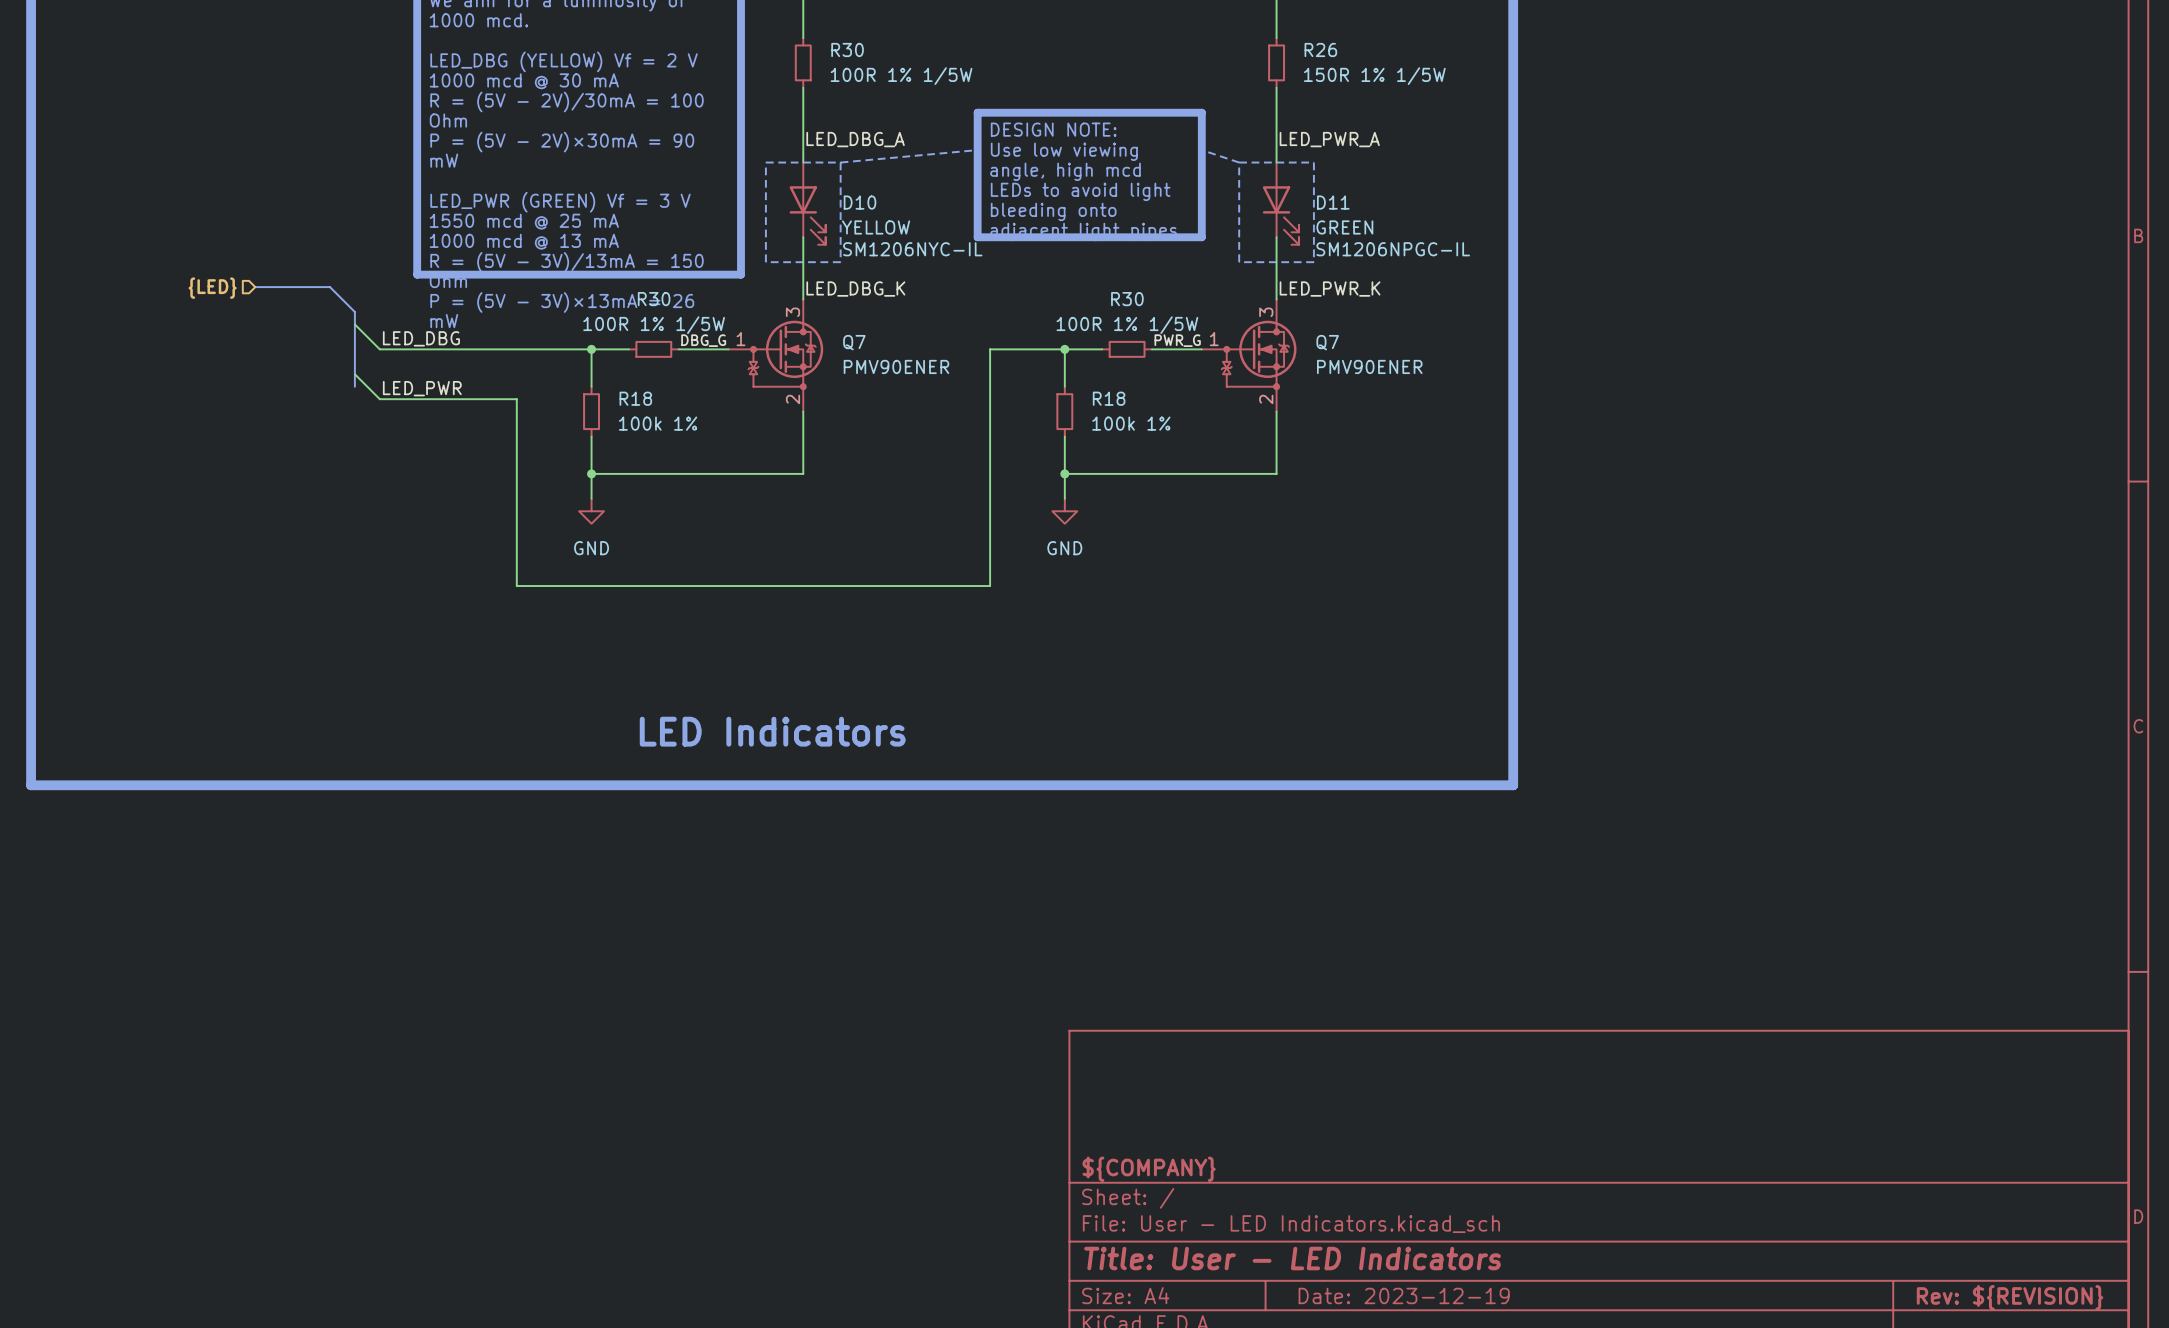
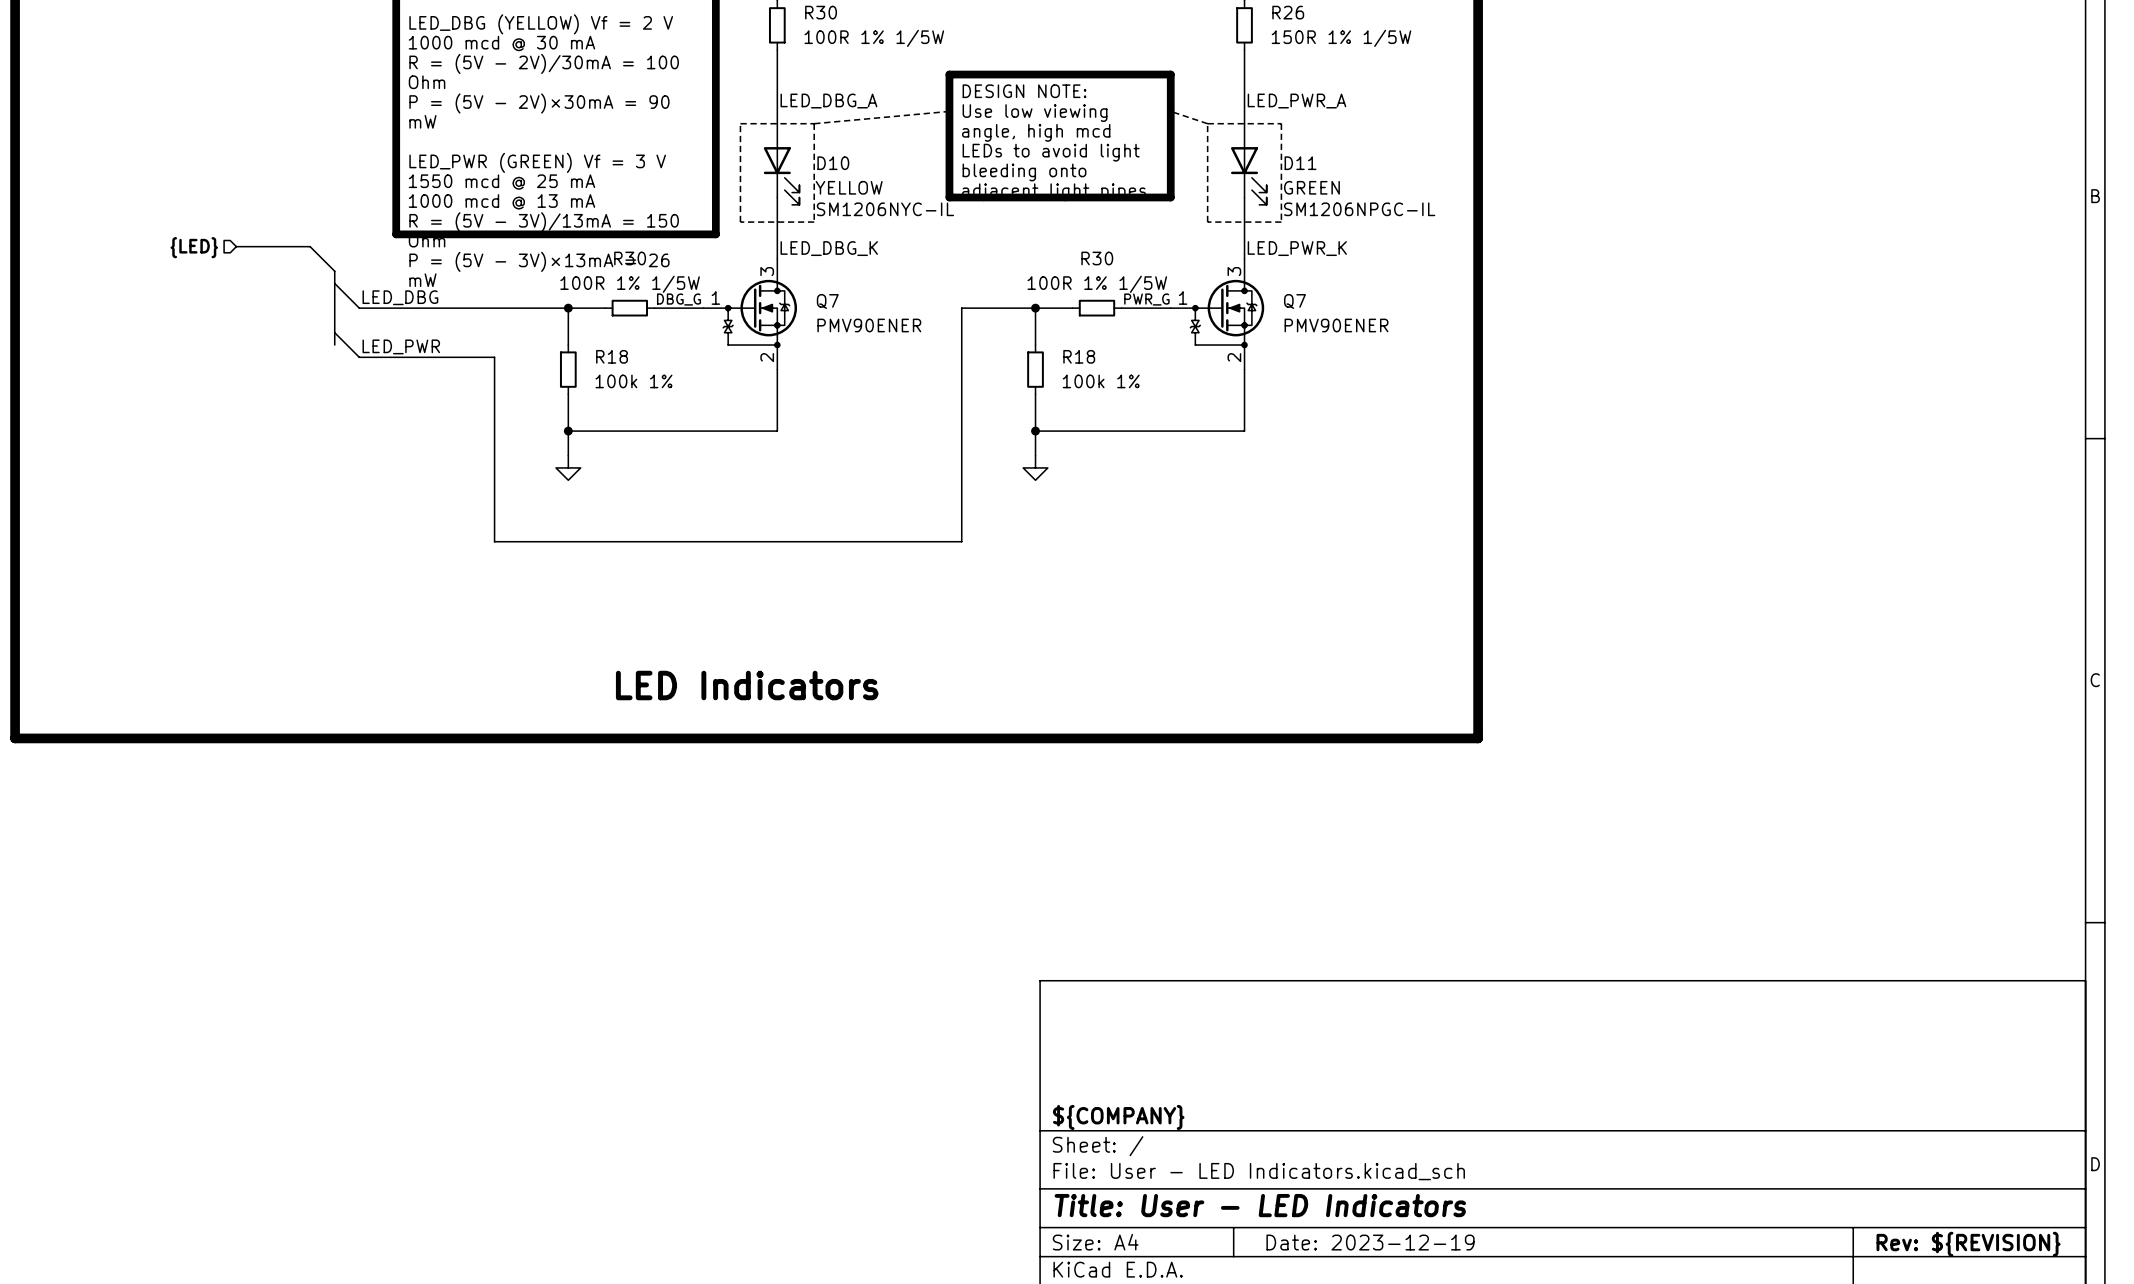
power symbol text: GND (591, 548) -> none
power symbol text: GND (1064, 548) -> none

